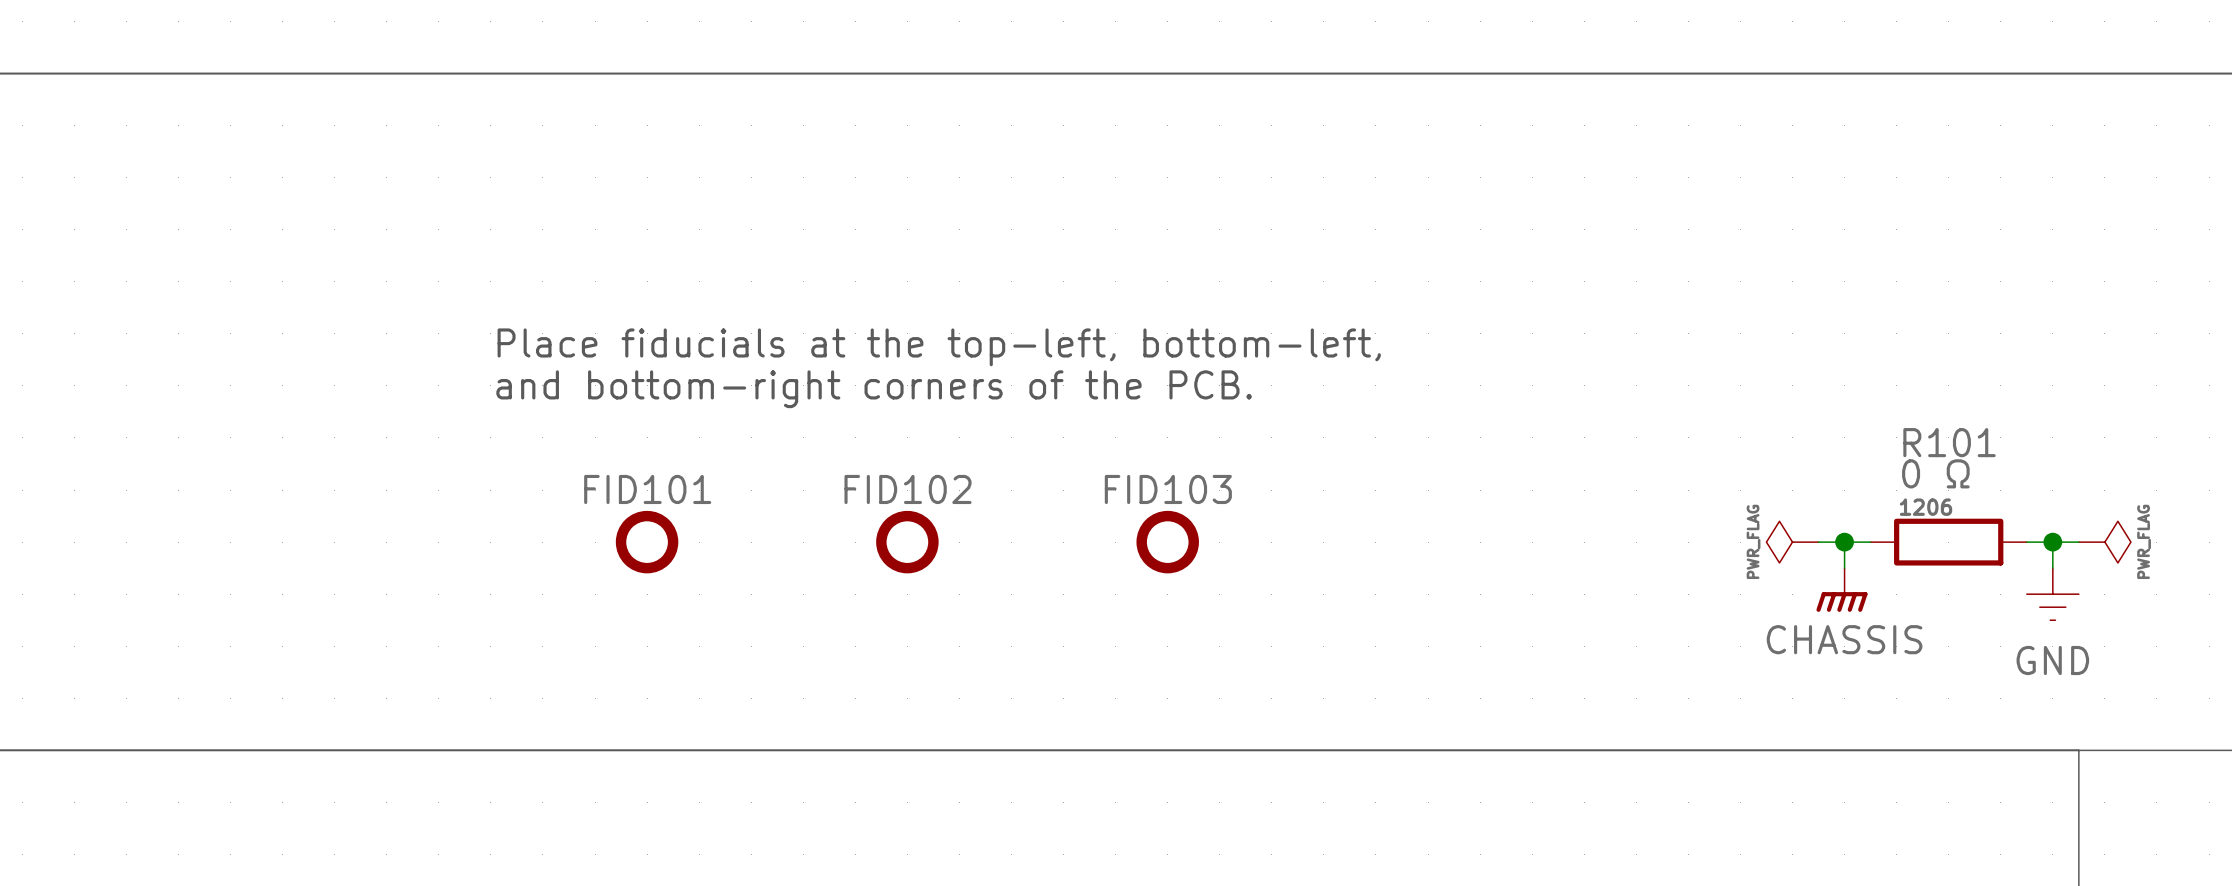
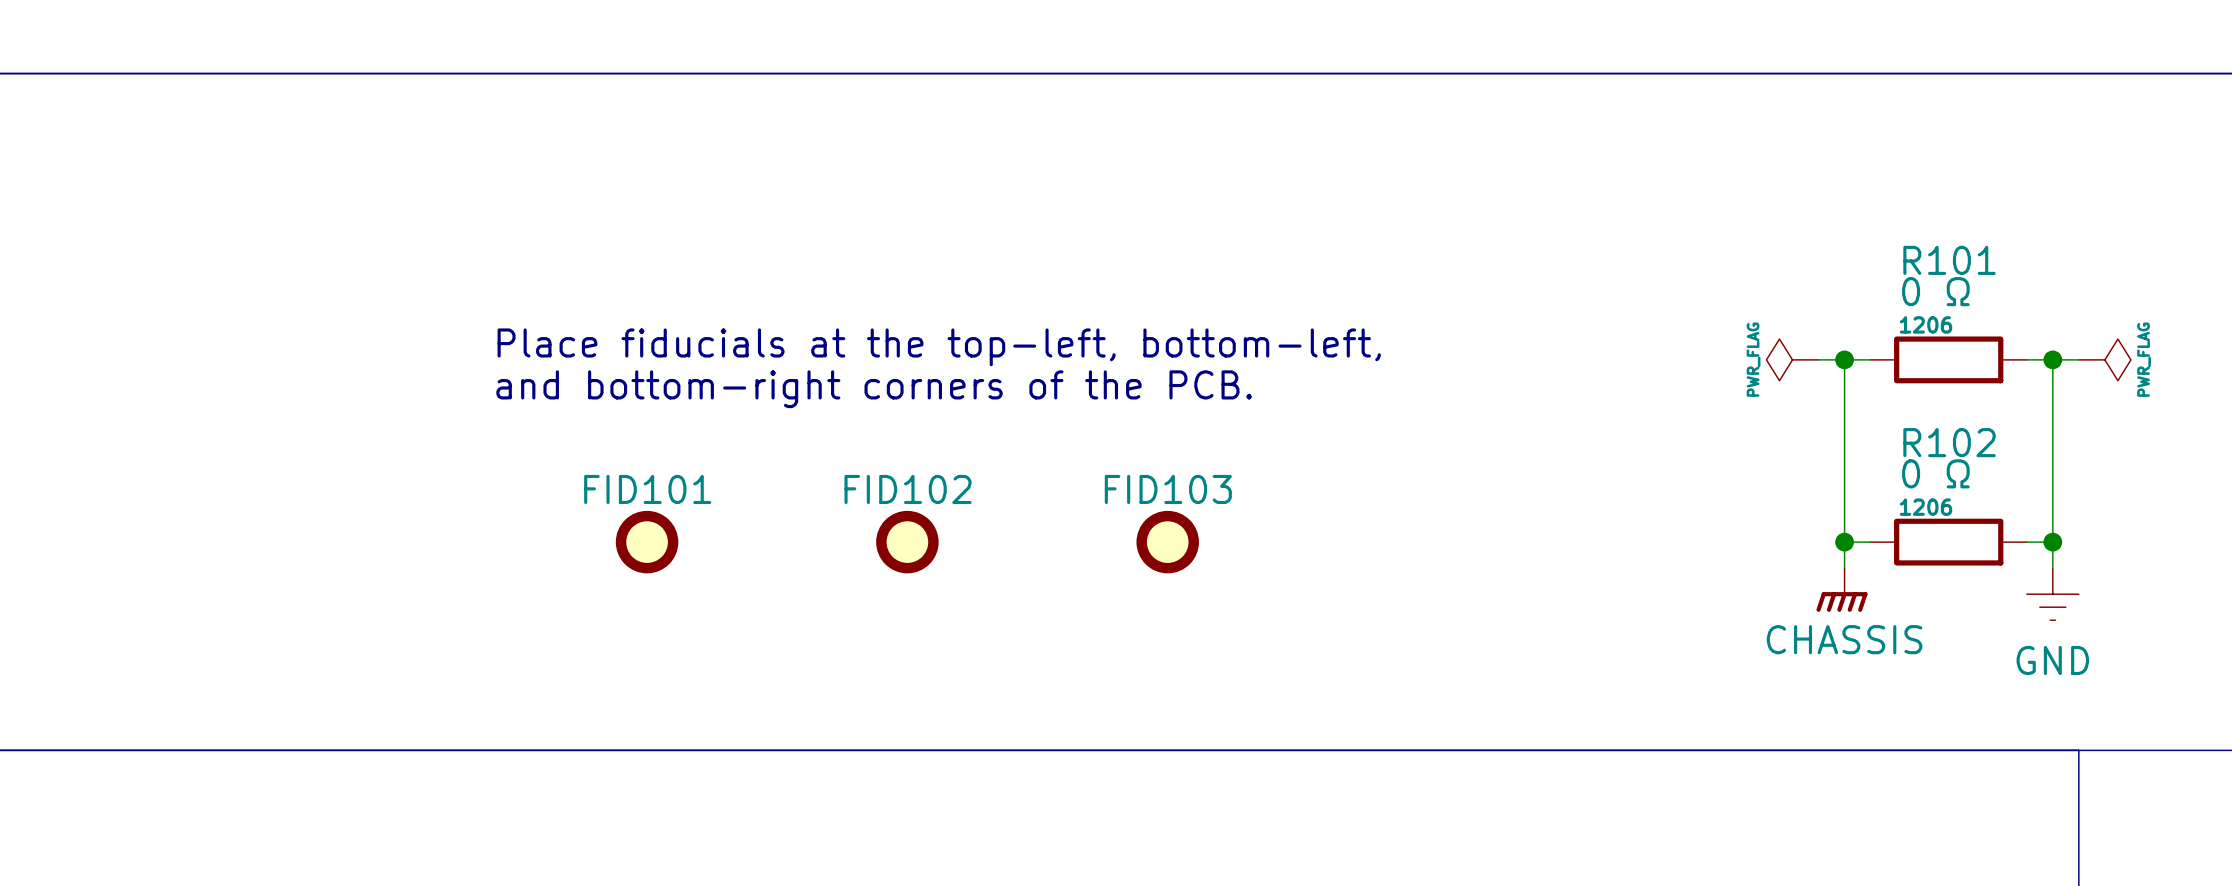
power symbol: none -> PWR_FLAG (1792, 359)
wire: none -> (1818, 359) (1870, 359)
junction: none -> (1844, 359)
R101: none -> 0 Ω (1948, 359)
wire: none -> (2026, 359) (2078, 359)
junction: none -> (2052, 359)
power symbol: none -> PWR_FLAG (2104, 359)
R101 name: R101 (1949, 442) -> R102 (1949, 442)
power symbol: PWR_FLAG (1792, 542) -> none
wire: (1818, 542) (1844, 542) -> (1844, 359) (1844, 542)
wire: (2052, 542) (2078, 542) -> (2052, 542) (2052, 359)
power symbol: PWR_FLAG (2104, 542) -> none

